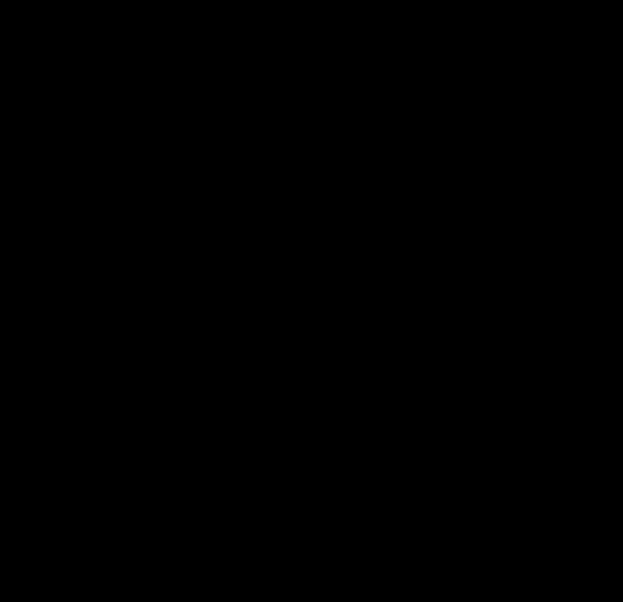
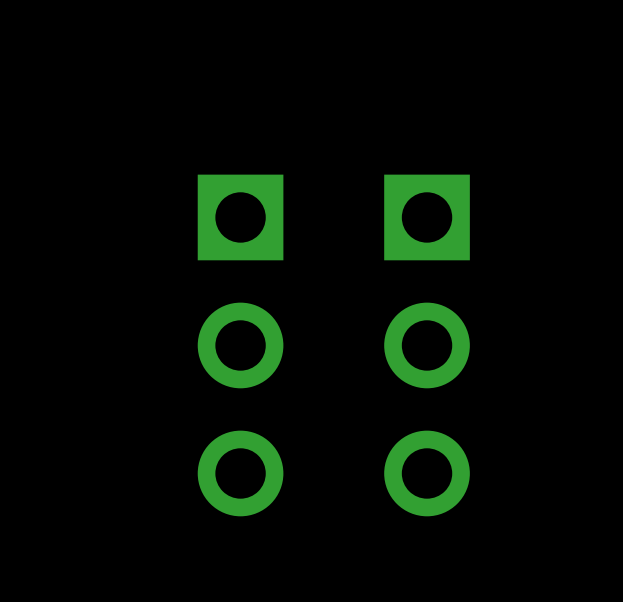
part: none -> (240, 345)
part: none -> (427, 345)

